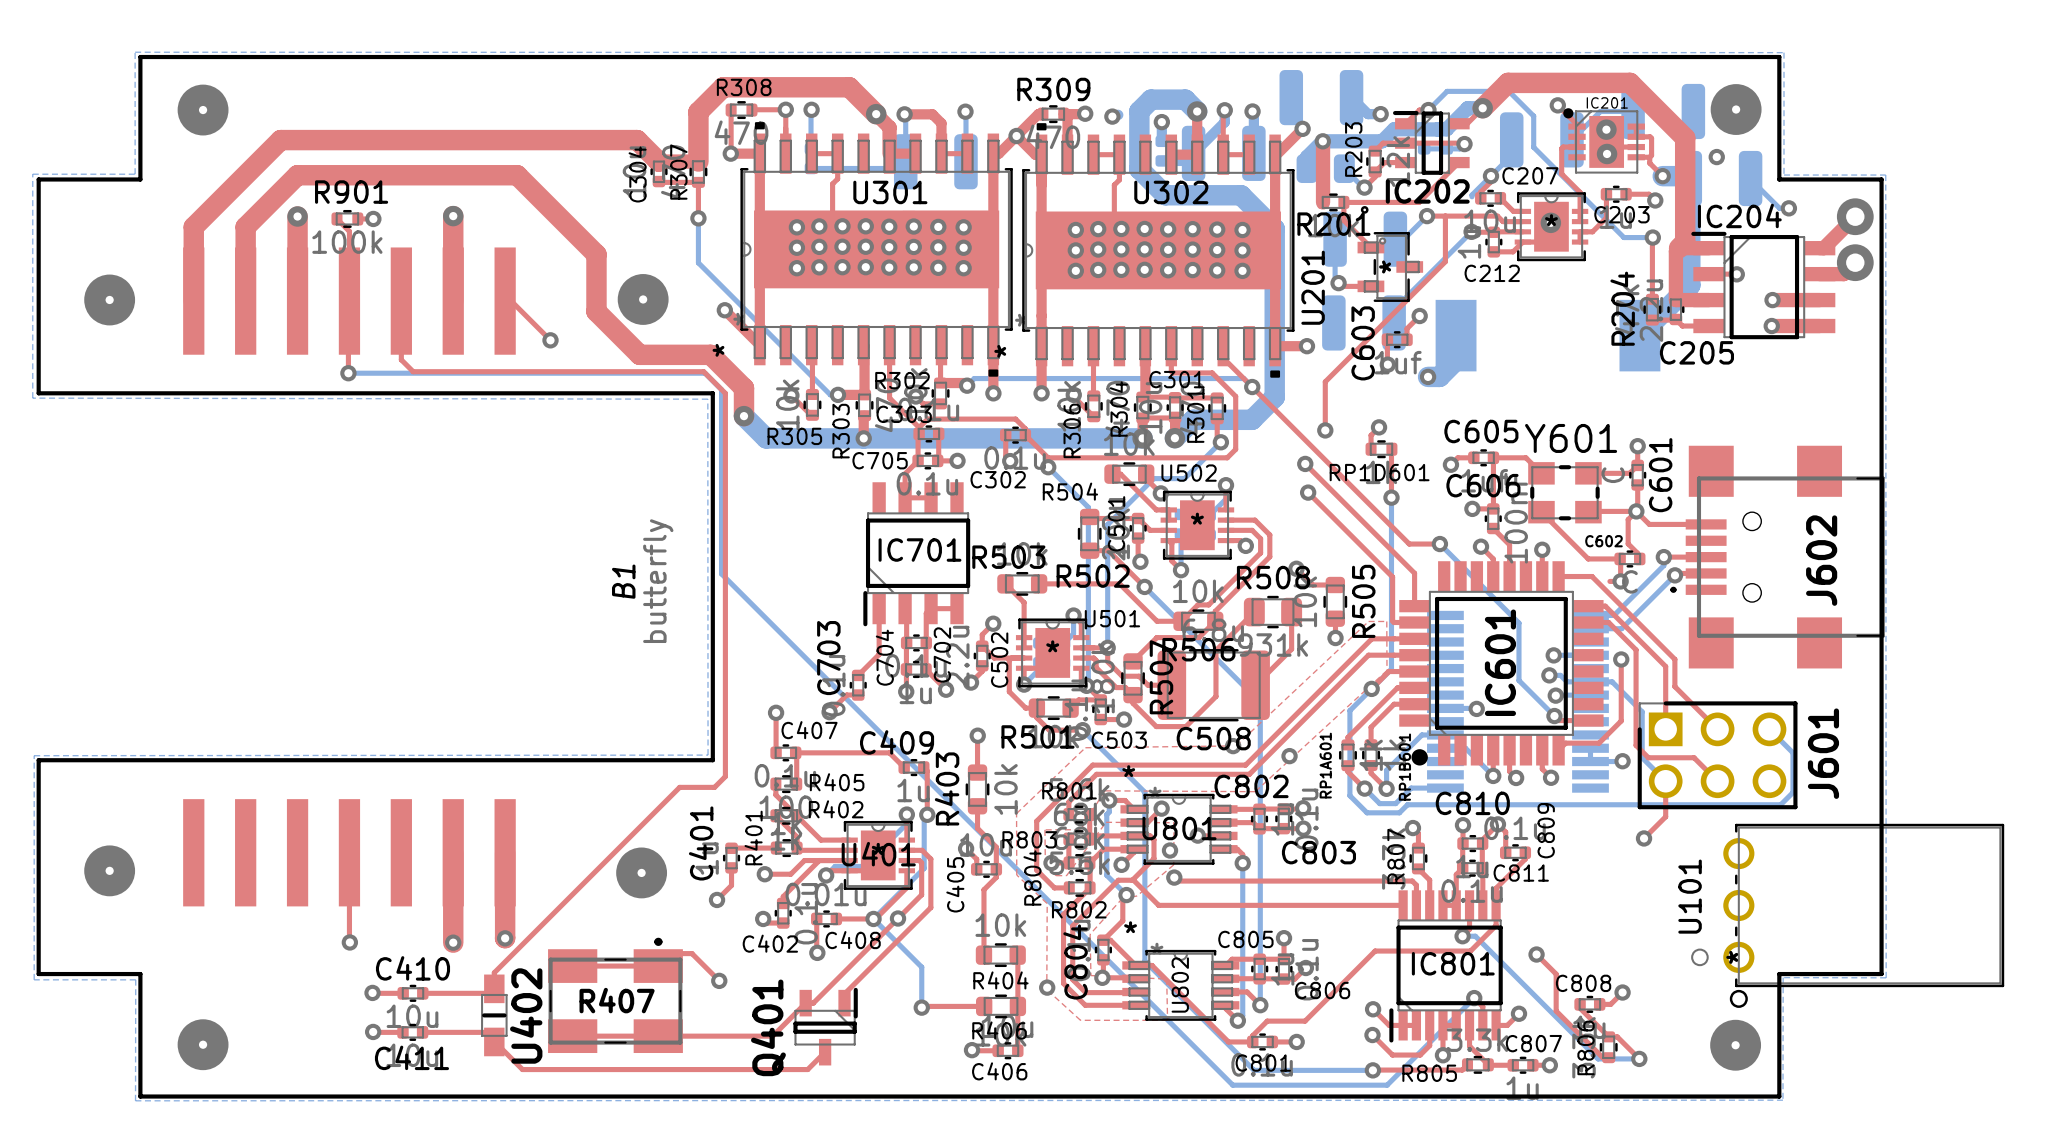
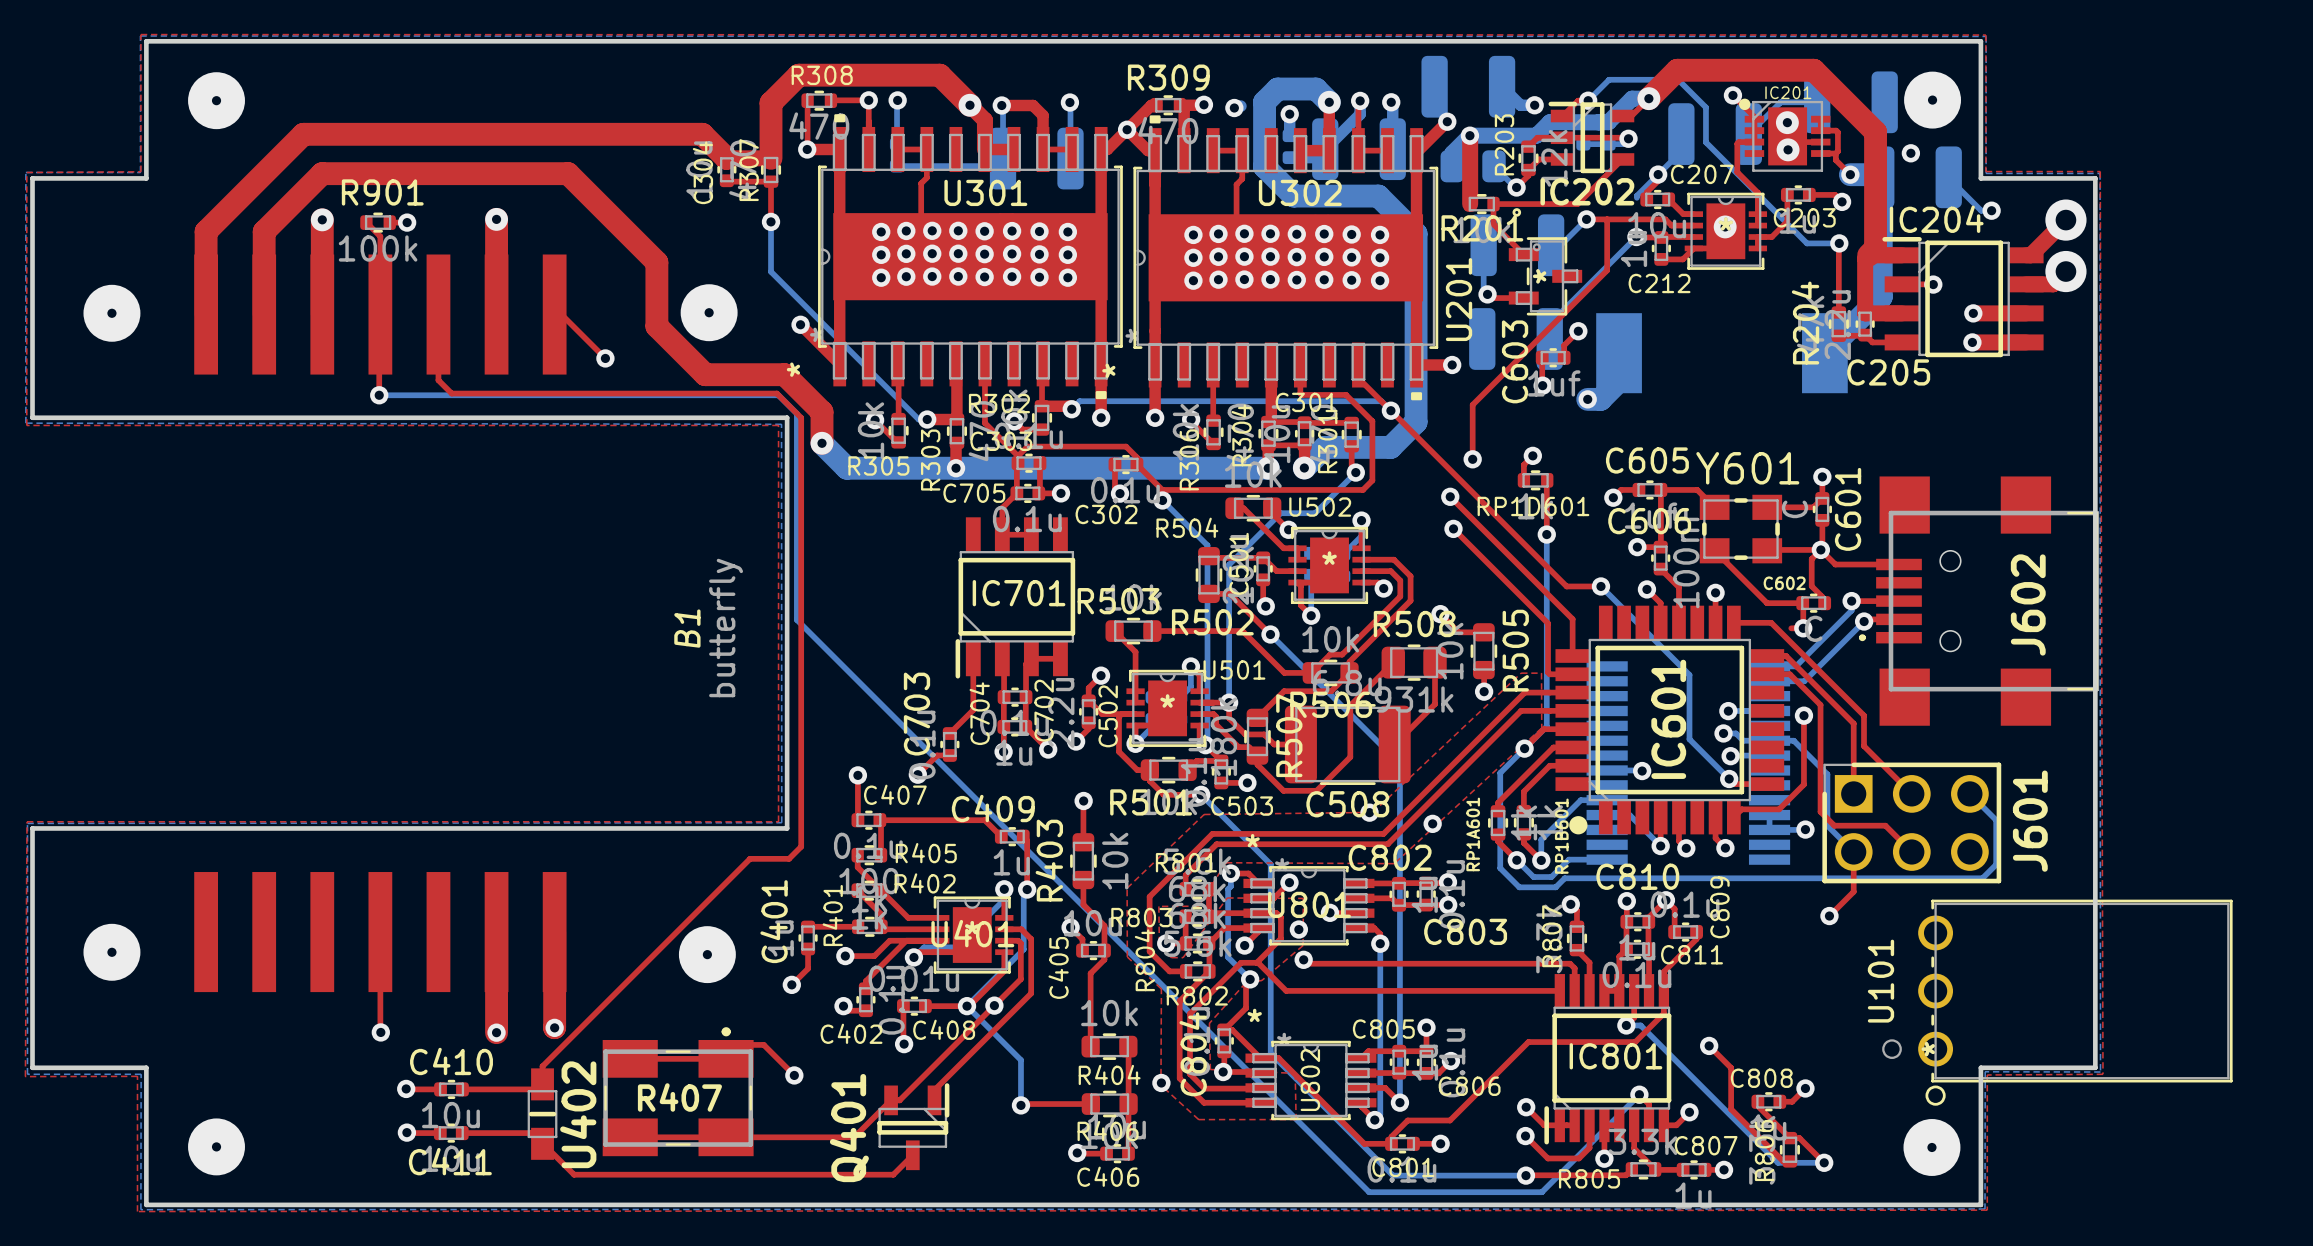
top zone outline: none -> (140, 34) (140, 171) (26, 172) (26, 425) (778, 425) (778, 821) (27, 821) (25, 1076) (137, 1076) (137, 1211) (1987, 1210) (1987, 1074) (2103, 1074) (2100, 171) (1985, 171) (1985, 35) (140, 34)

